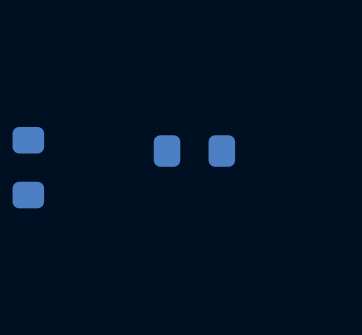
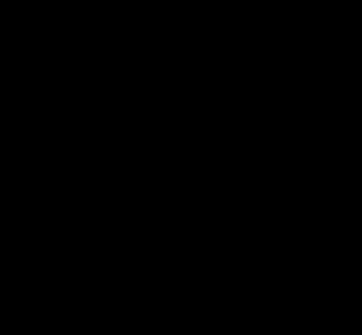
part: (194, 151) -> none
part: (28, 167) -> none

